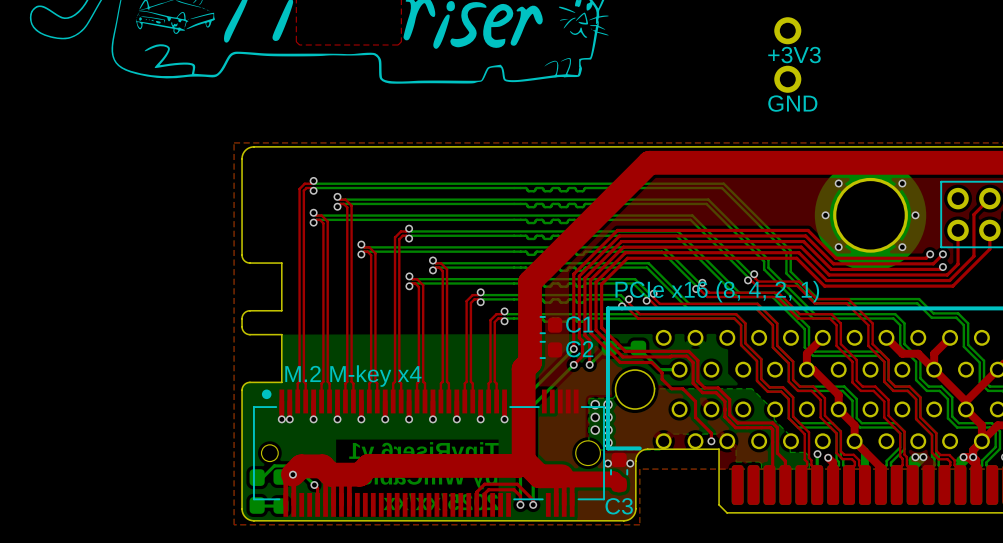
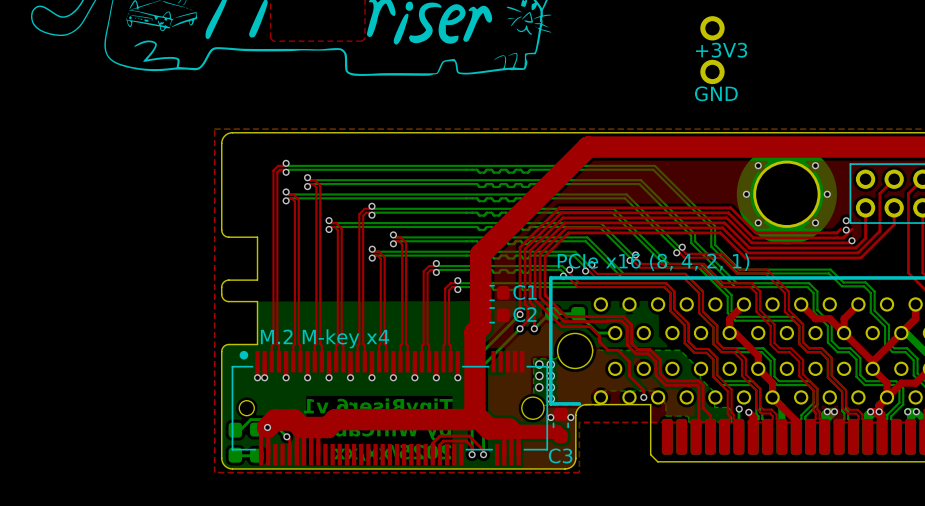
via: none -> (846, 220)
via: (930, 254) -> none
via: (942, 254) -> none
via: none -> (846, 230)

